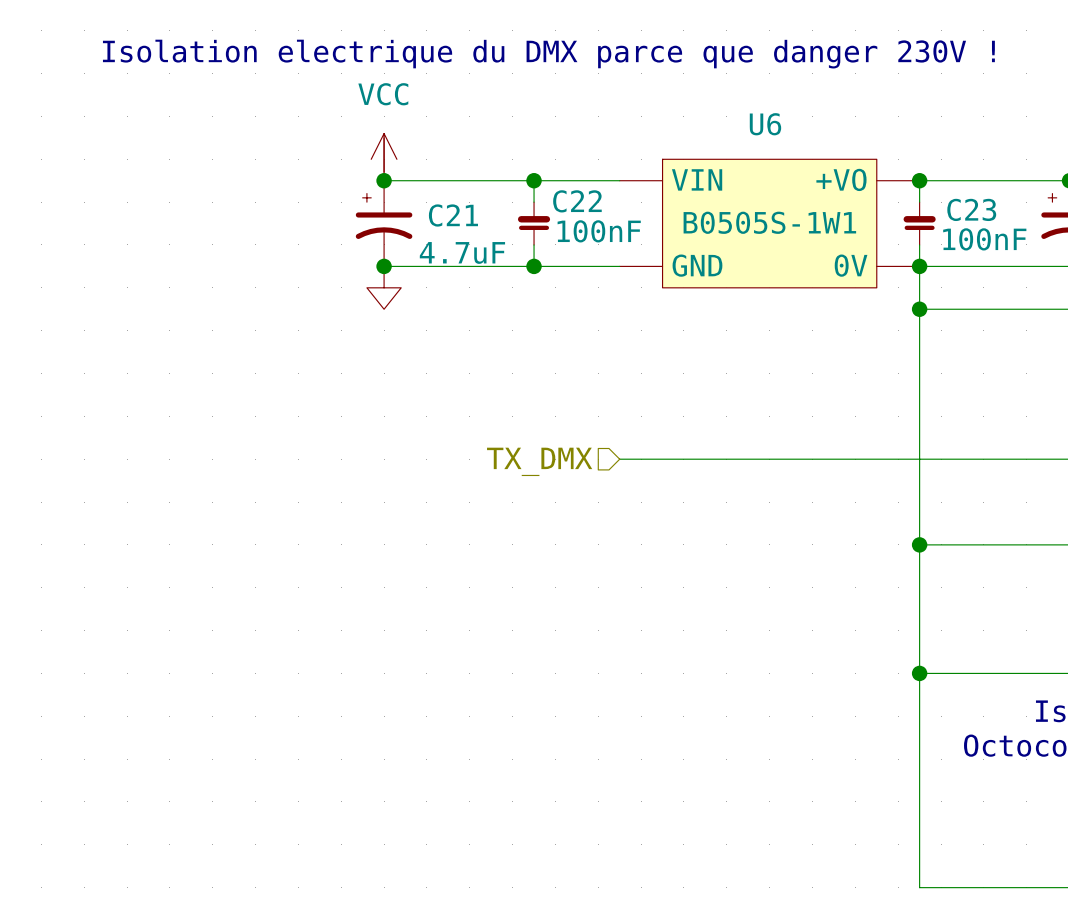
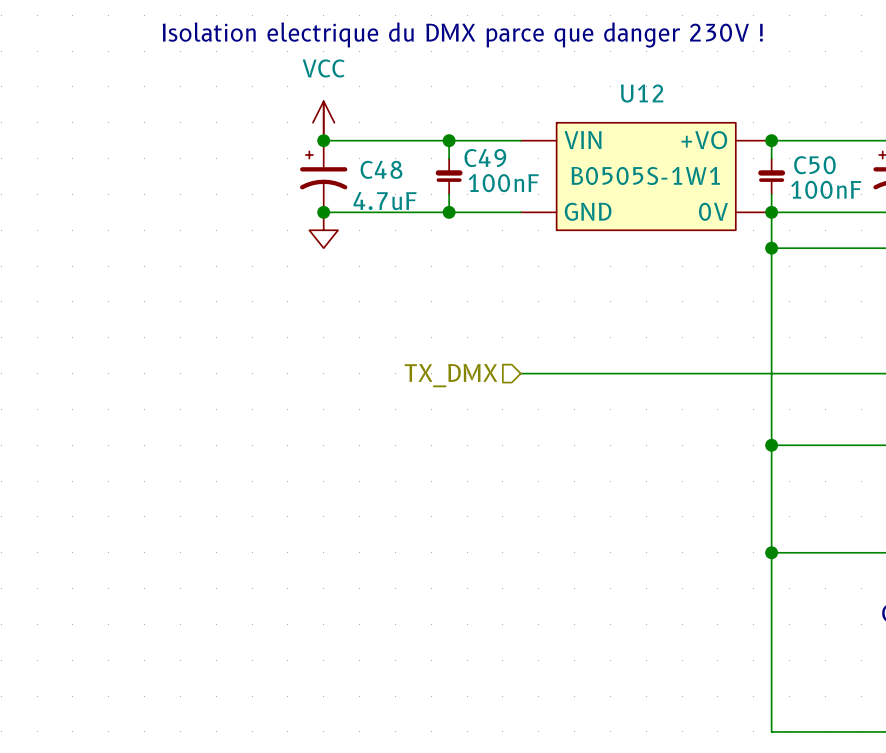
U6 name: U6 (765, 124) -> U12 (642, 93)
C22 name: C22 (577, 201) -> C49 (485, 158)
C23 name: C23 (971, 209) -> C50 (814, 165)
C21 name: C21 (453, 215) -> C48 (381, 169)

